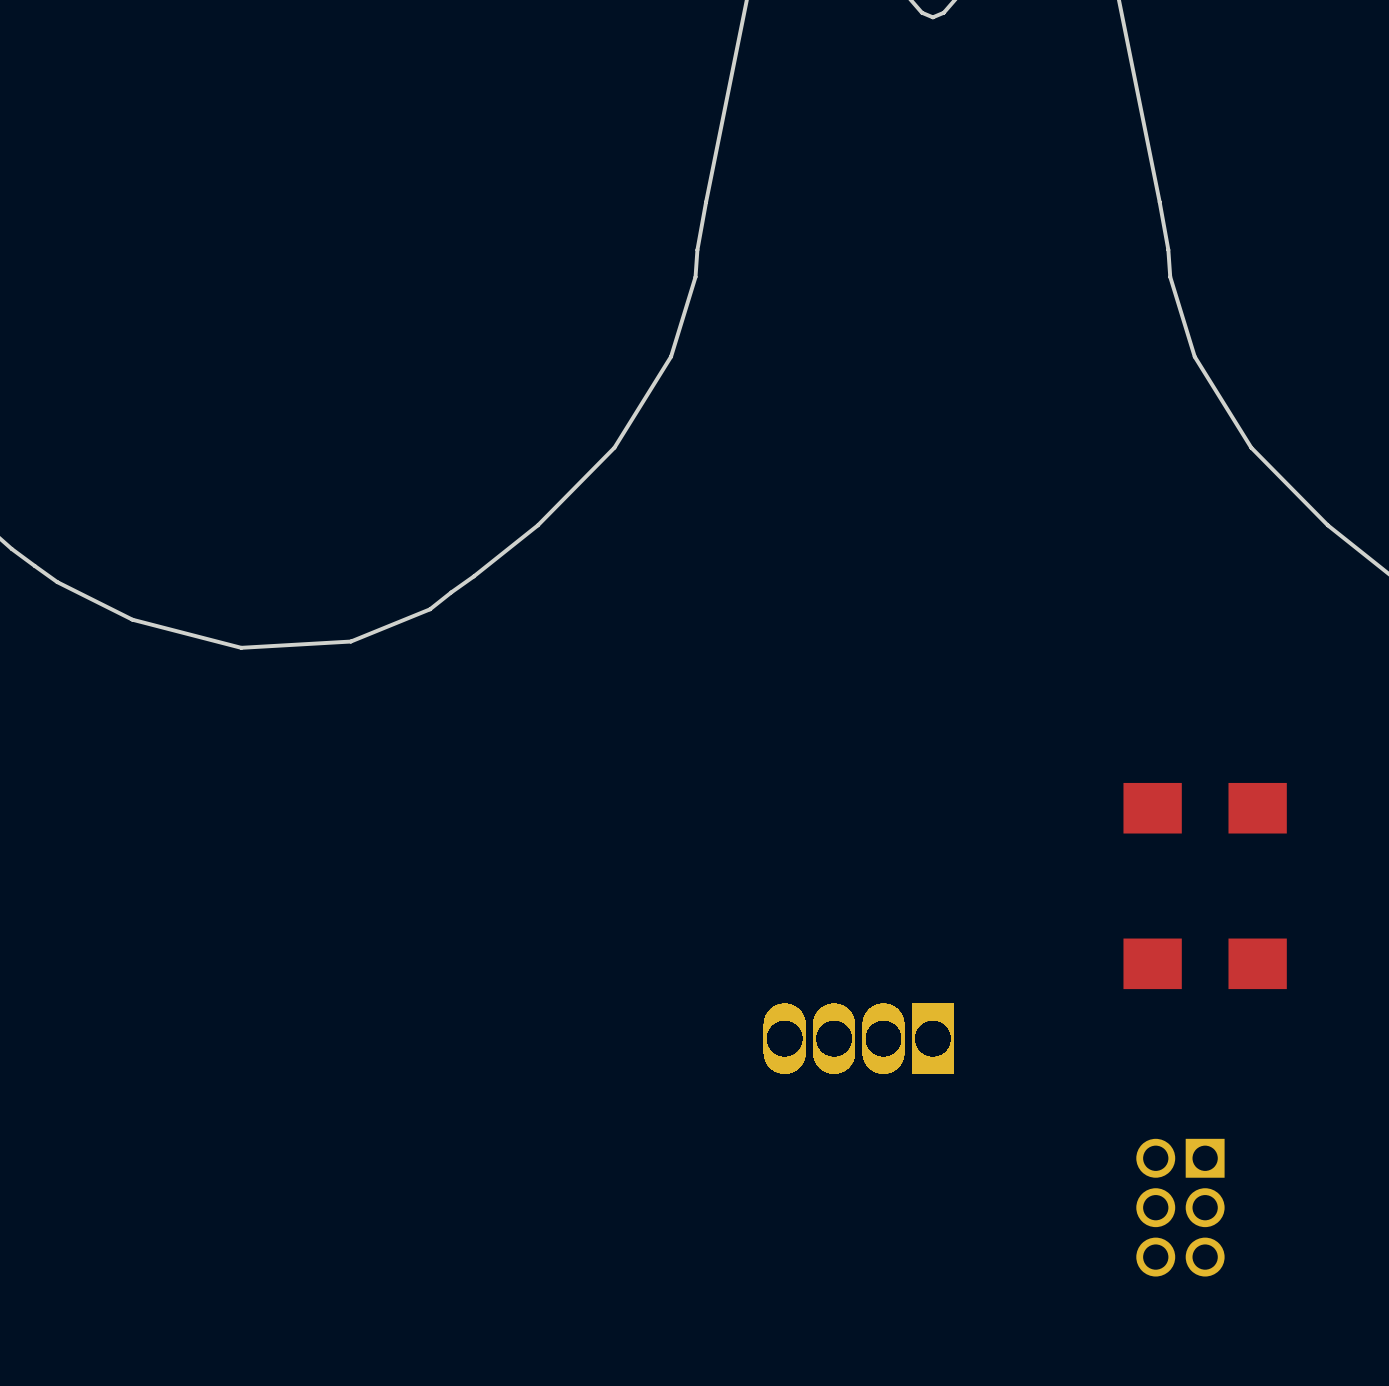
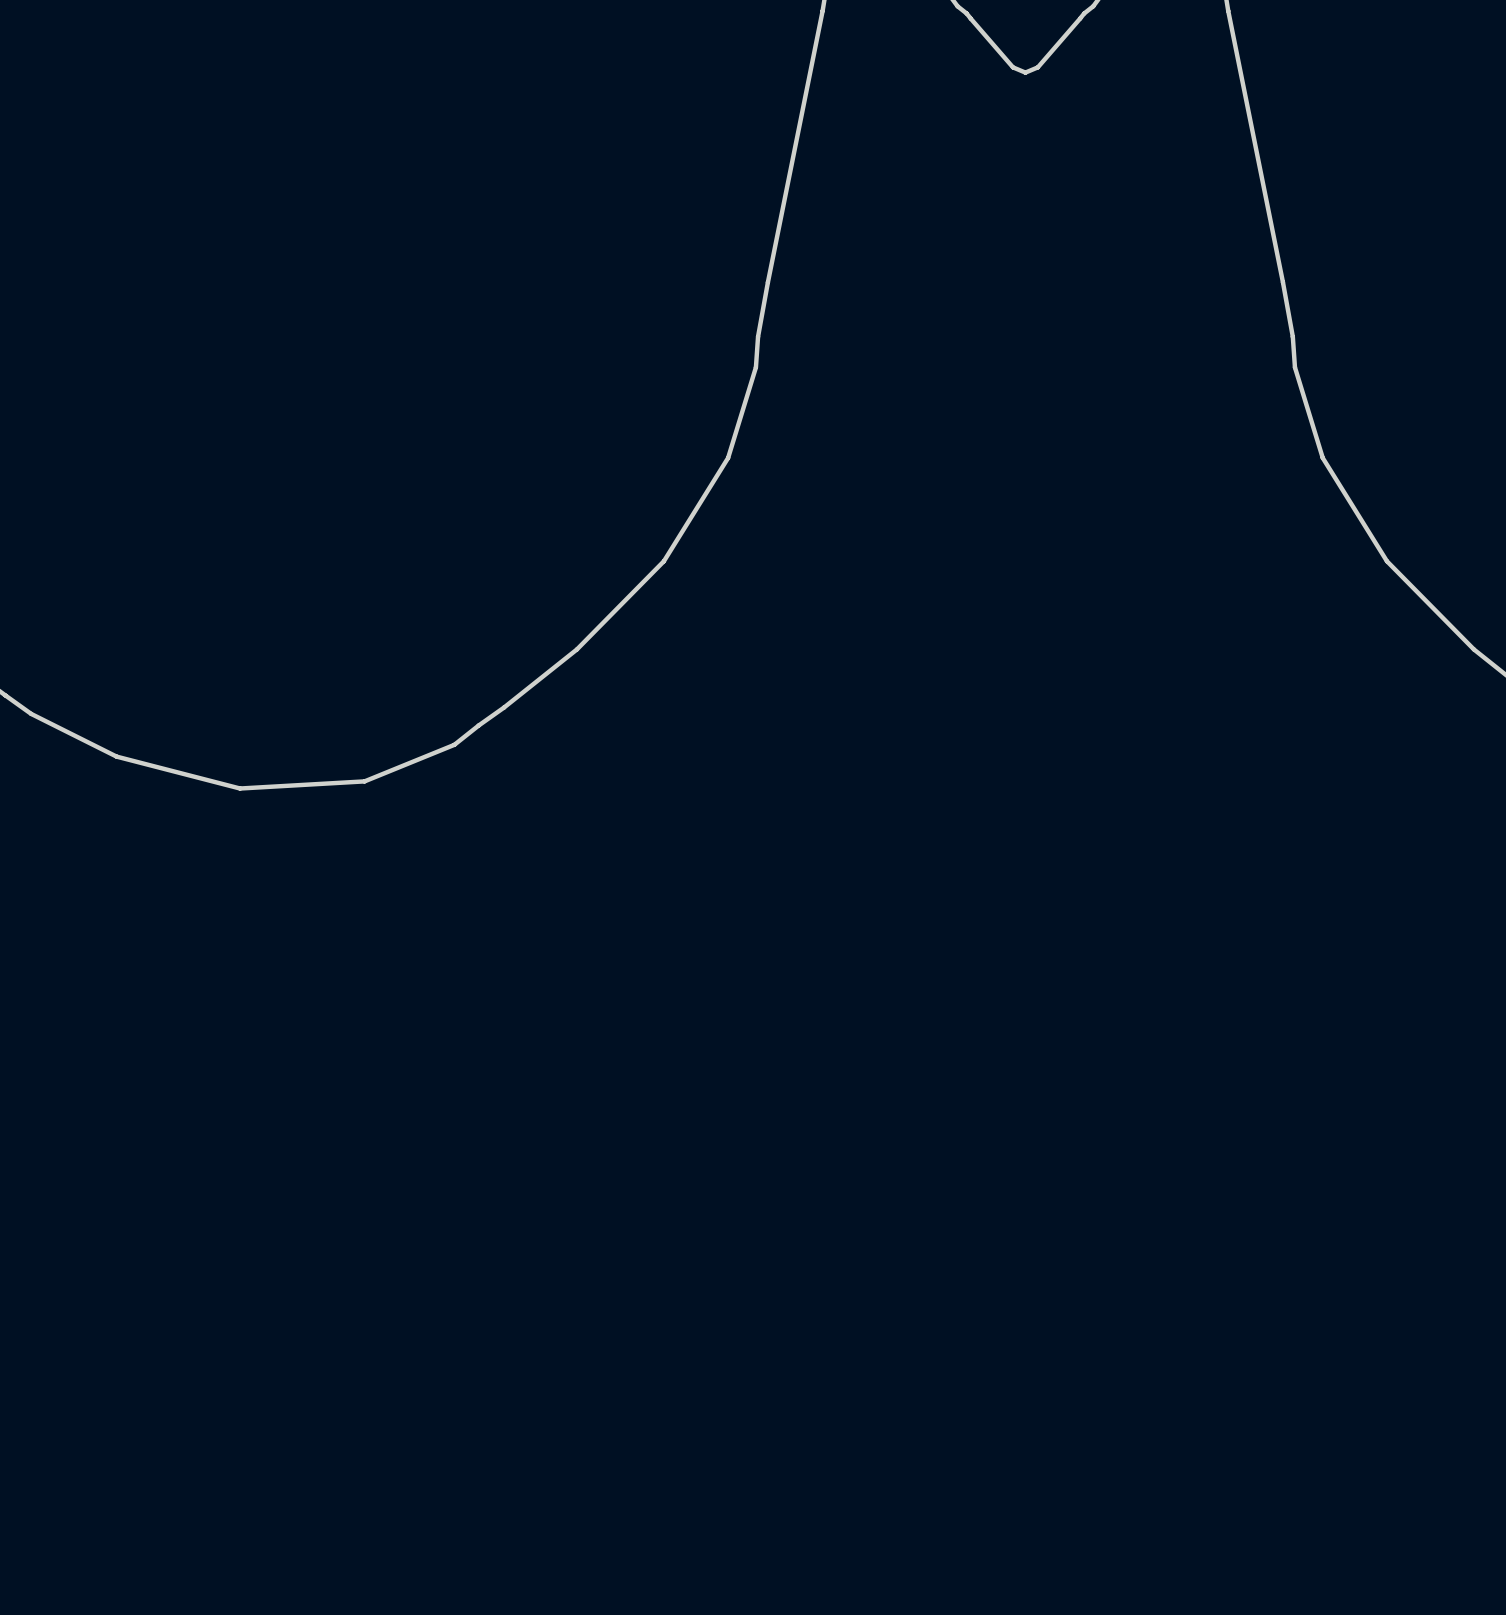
part: (1205, 808) -> none
part: (1205, 963) -> none
part: (858, 1038) -> none
part: (1180, 1207) -> none

